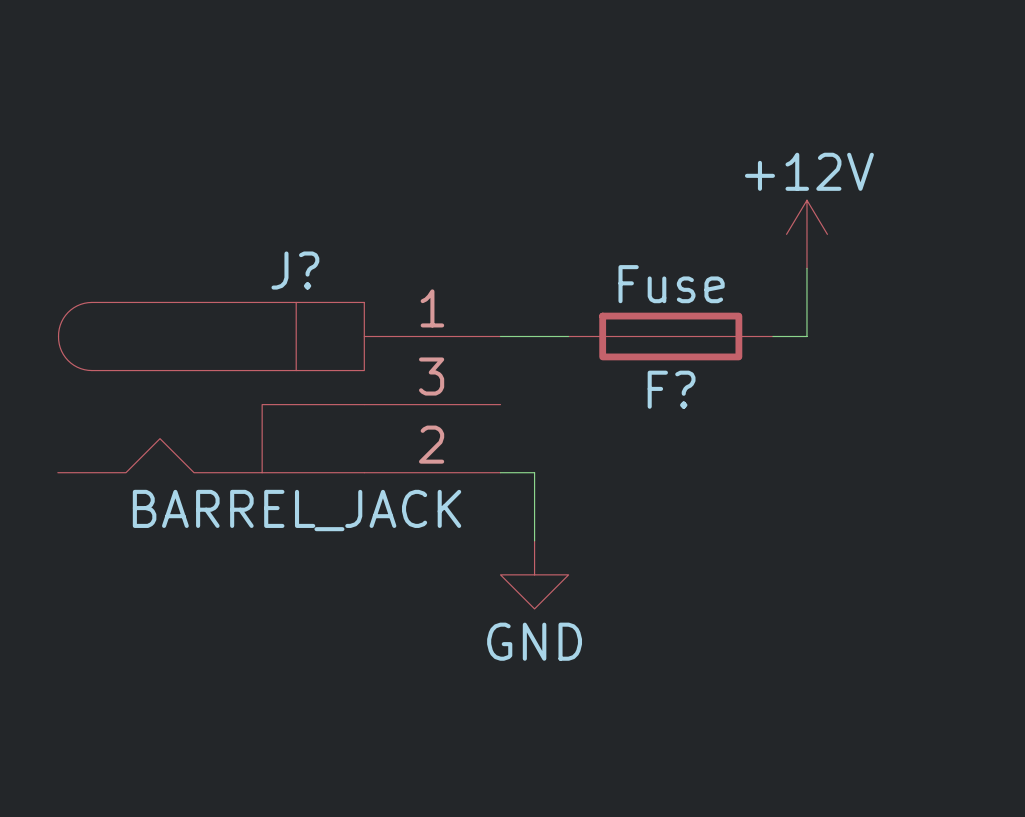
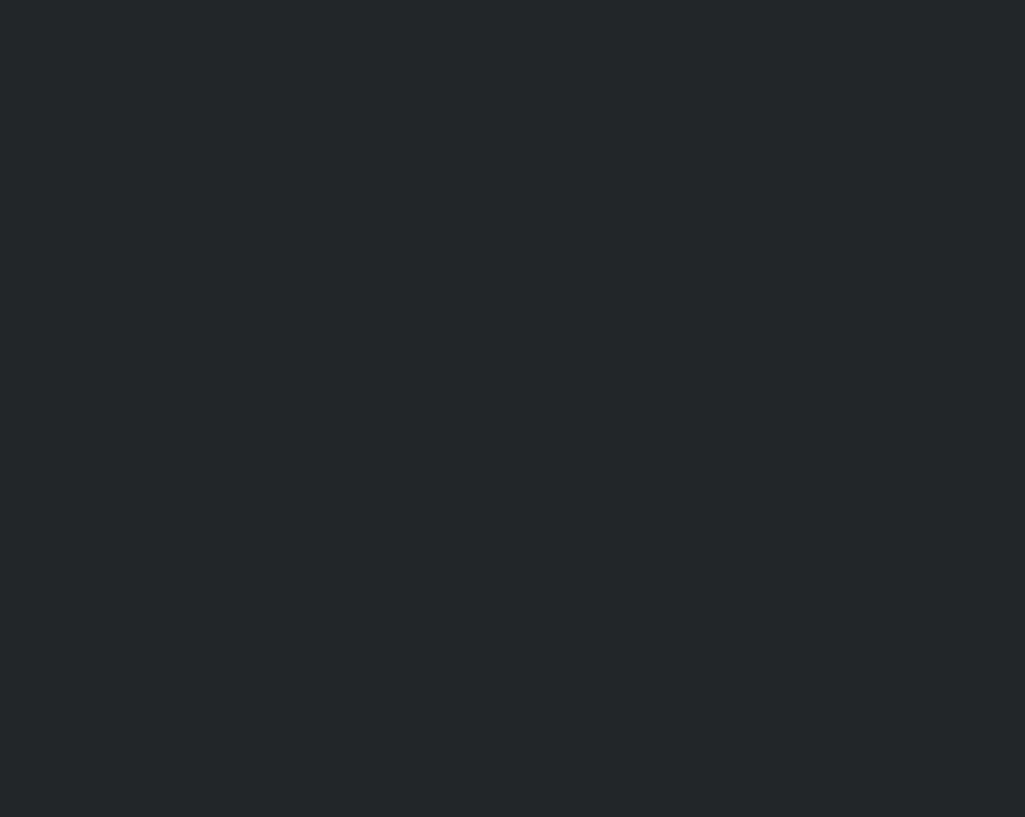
power symbol: +12V (806, 234) -> none
wire: (806, 268) (806, 336) (772, 336) -> none
wire: (500, 336) (568, 336) -> none
F?: Fuse (670, 336) -> none
J?: BARREL_JACK (279, 387) -> none
wire: (500, 472) (534, 472) (534, 540) -> none
power symbol: GND (534, 574) -> none

